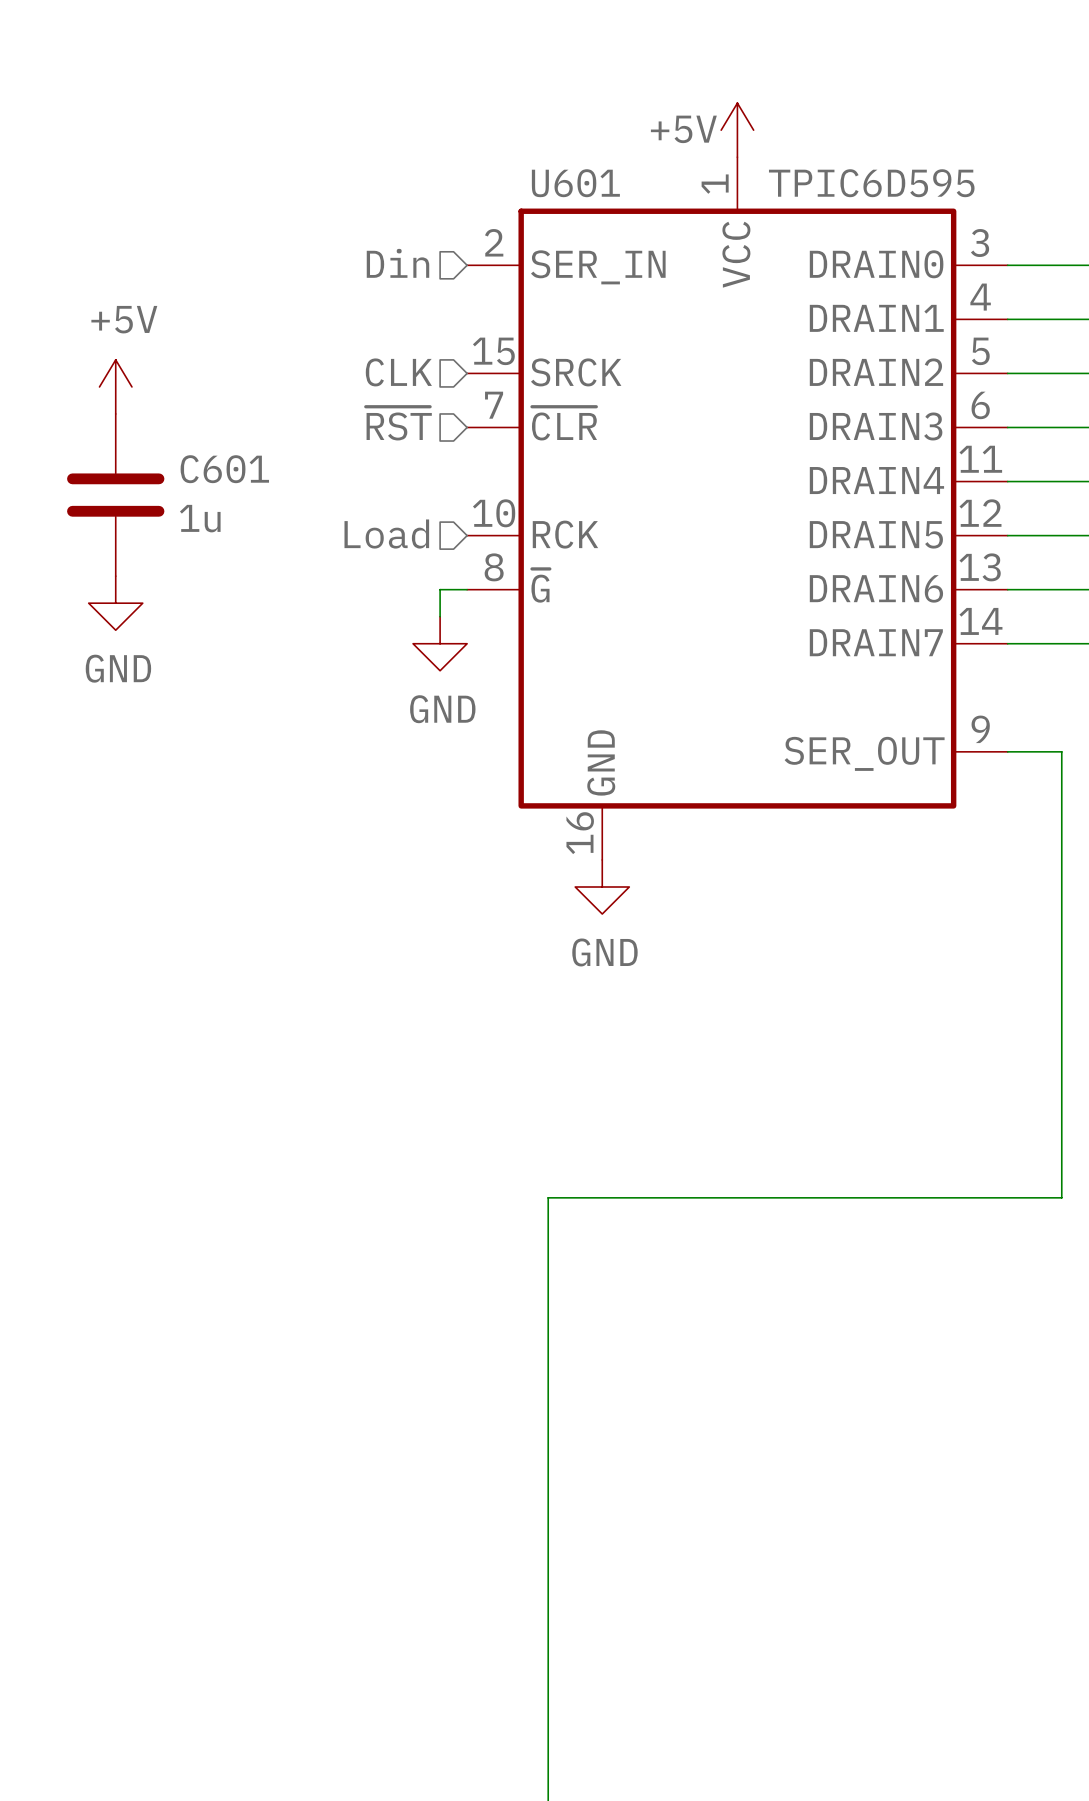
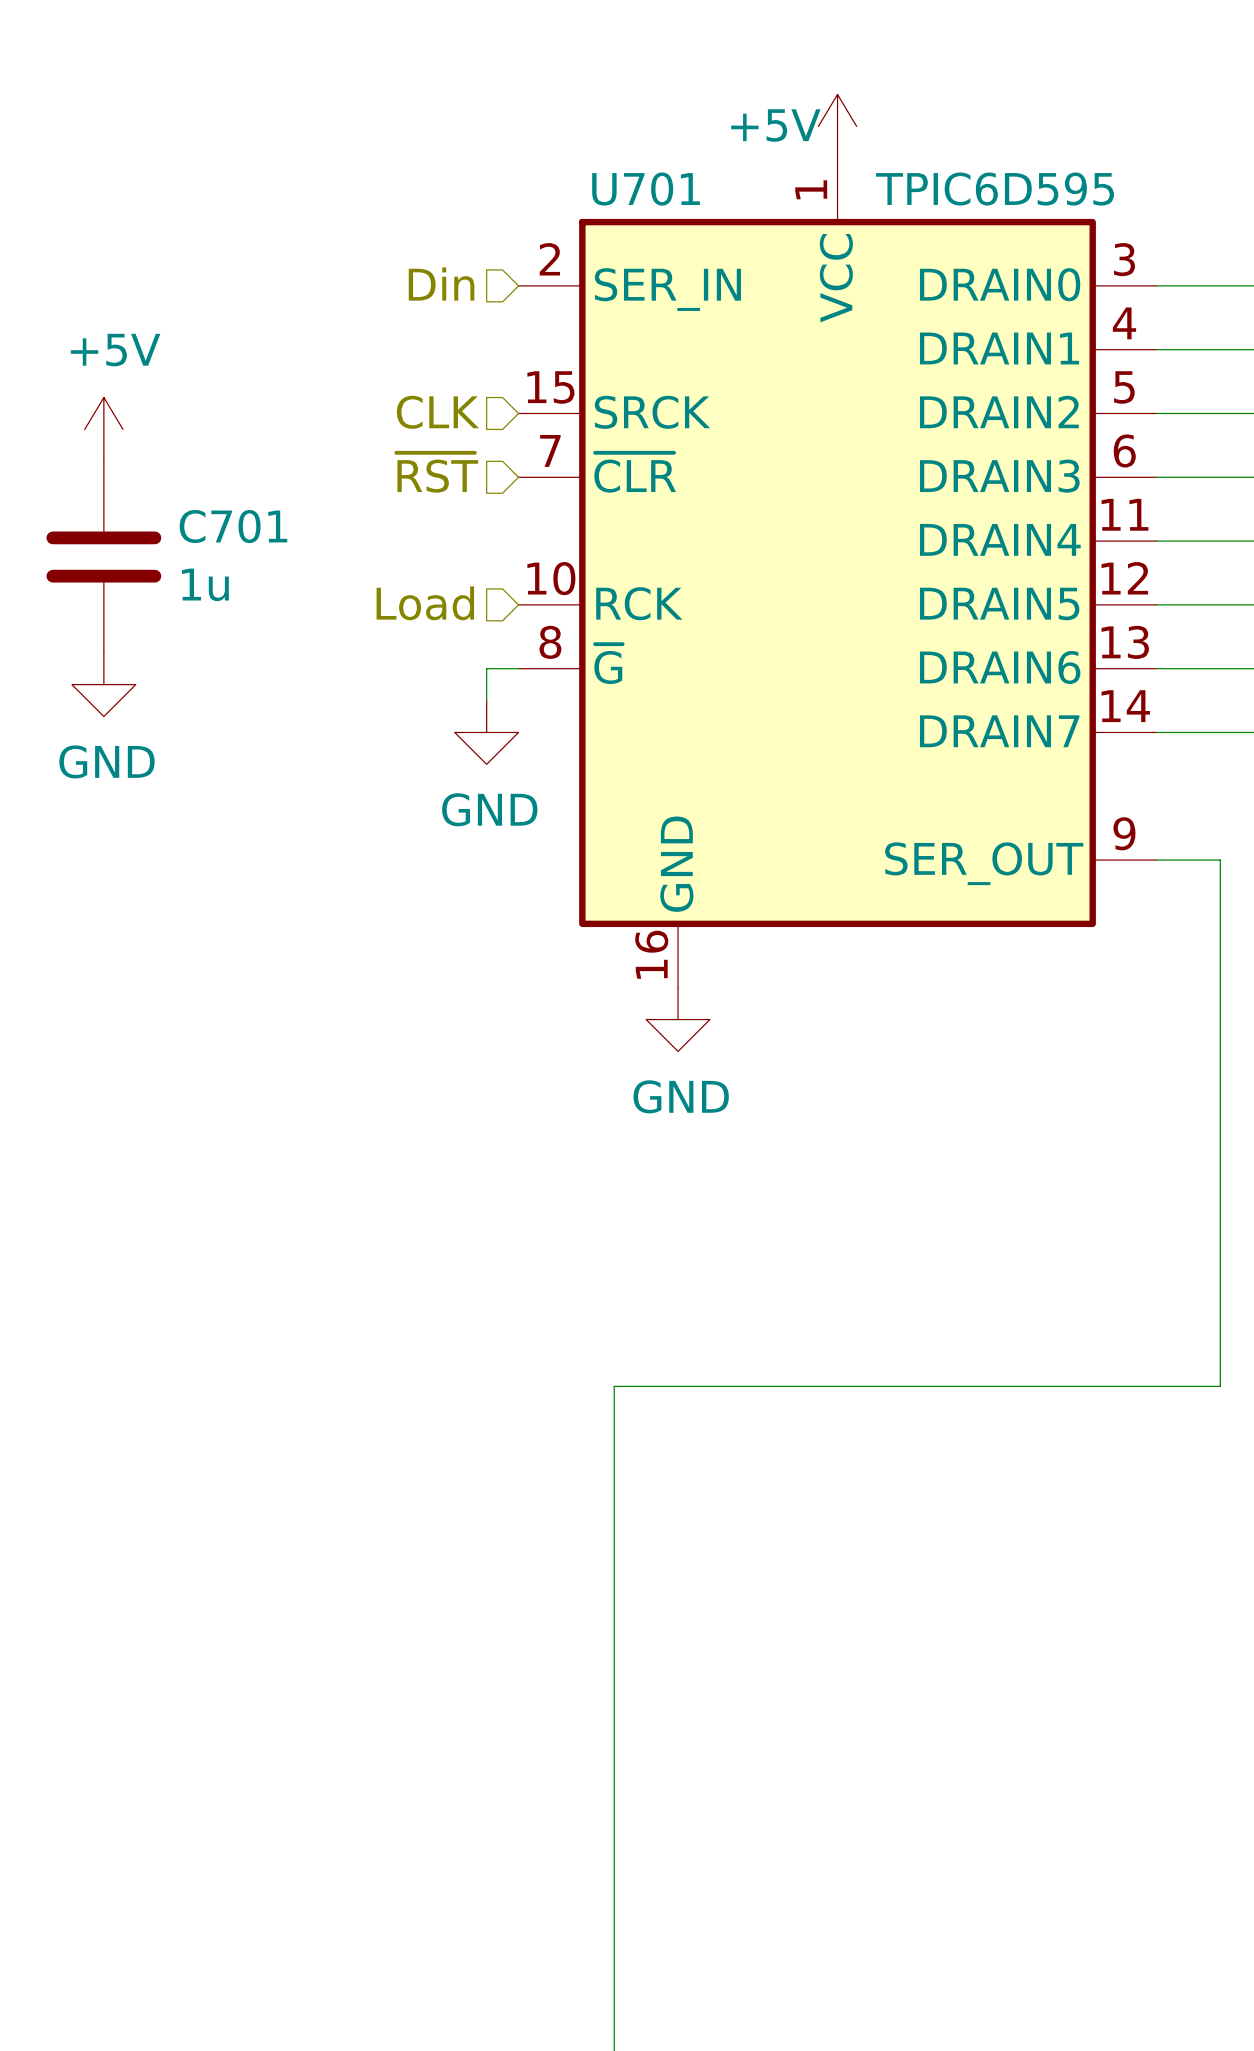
U601 name: U601 (575, 183) -> U701 (646, 189)
C601 name: C601 (224, 469) -> C701 (233, 526)

